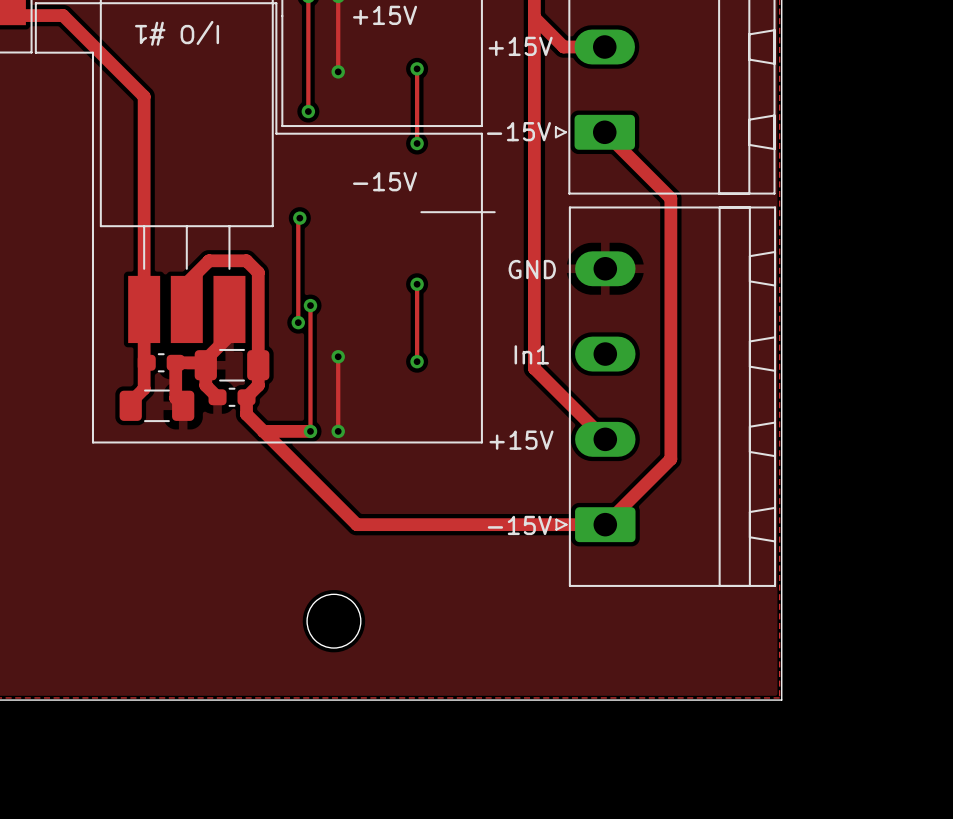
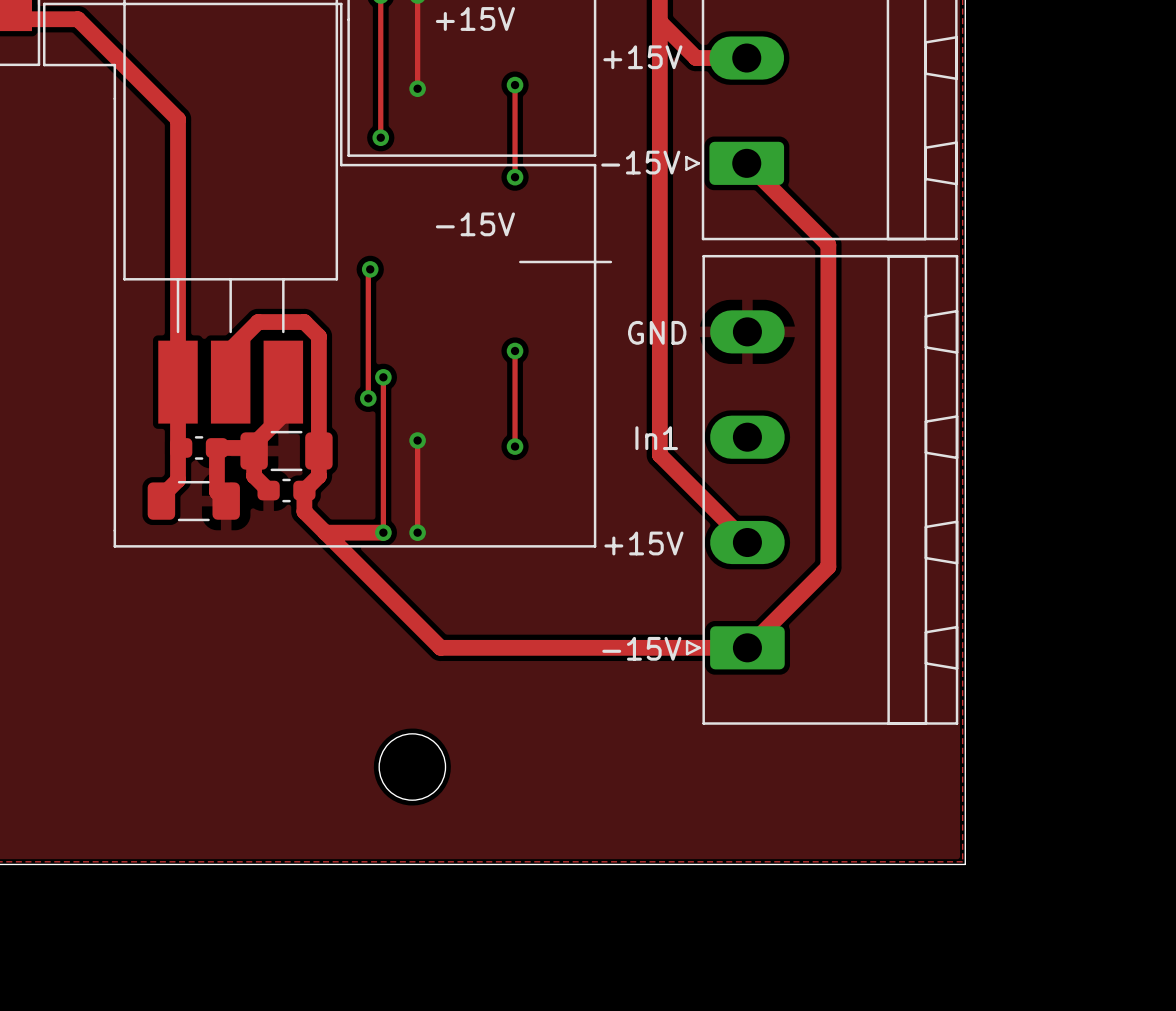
text: I/O #1 (177, 33) -> none

